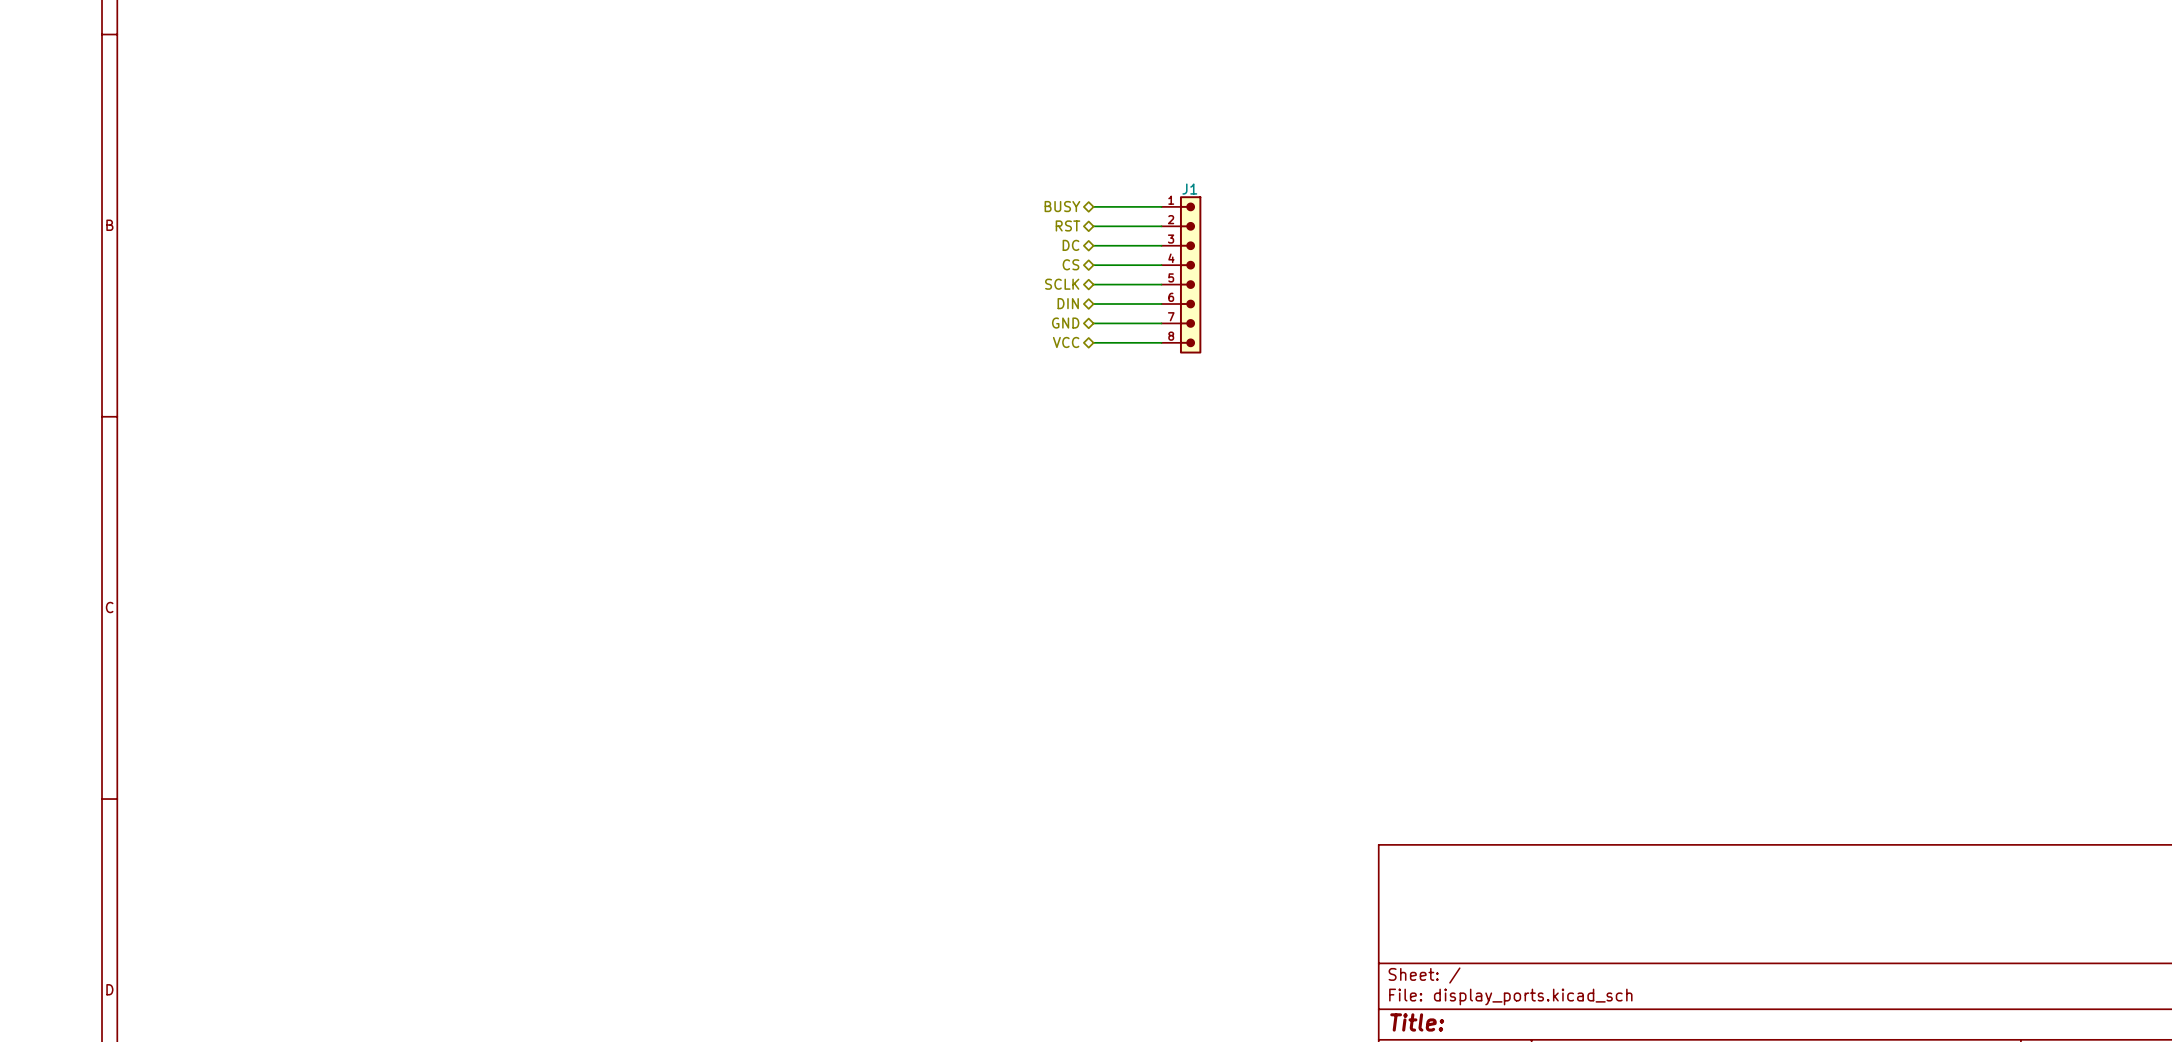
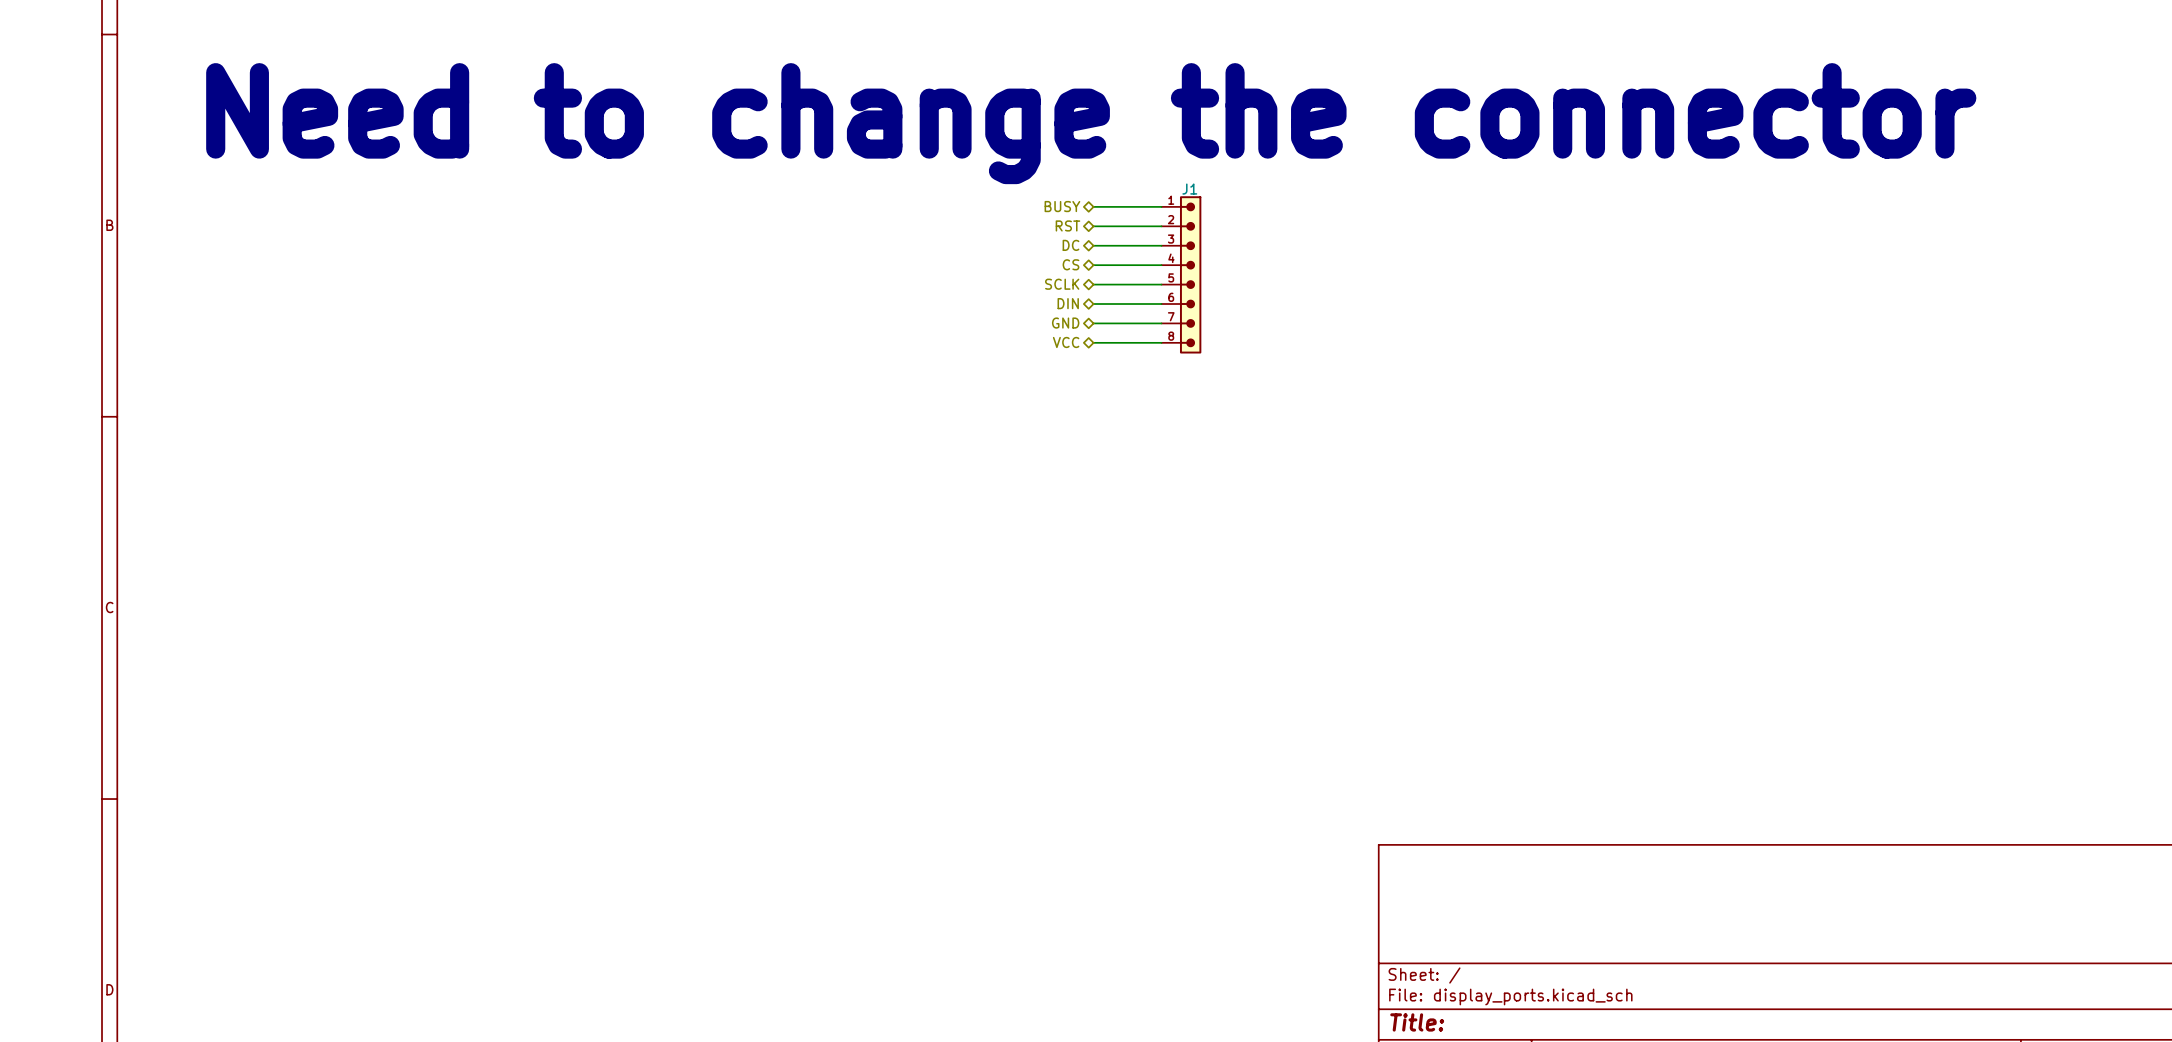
text: none -> Need to change the connector (1091, 123)

